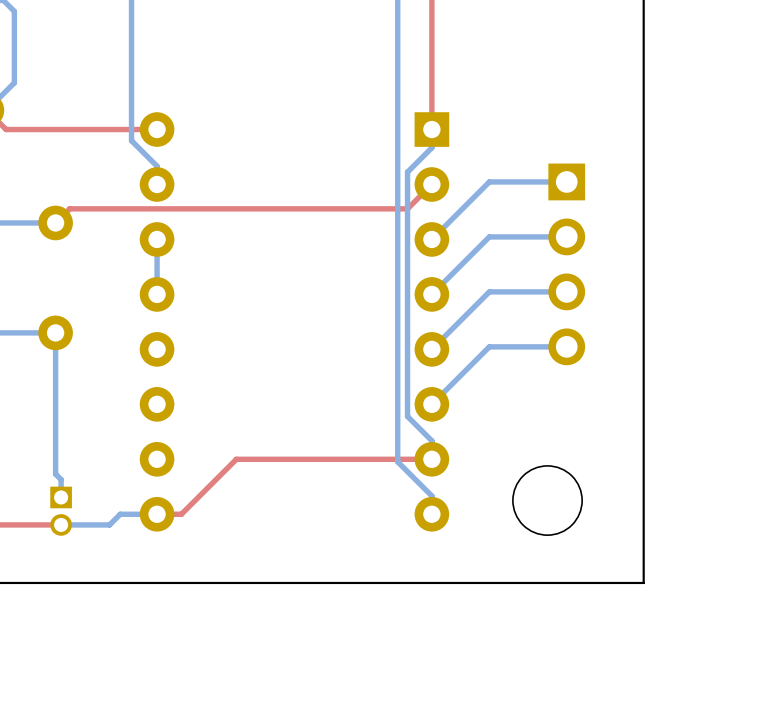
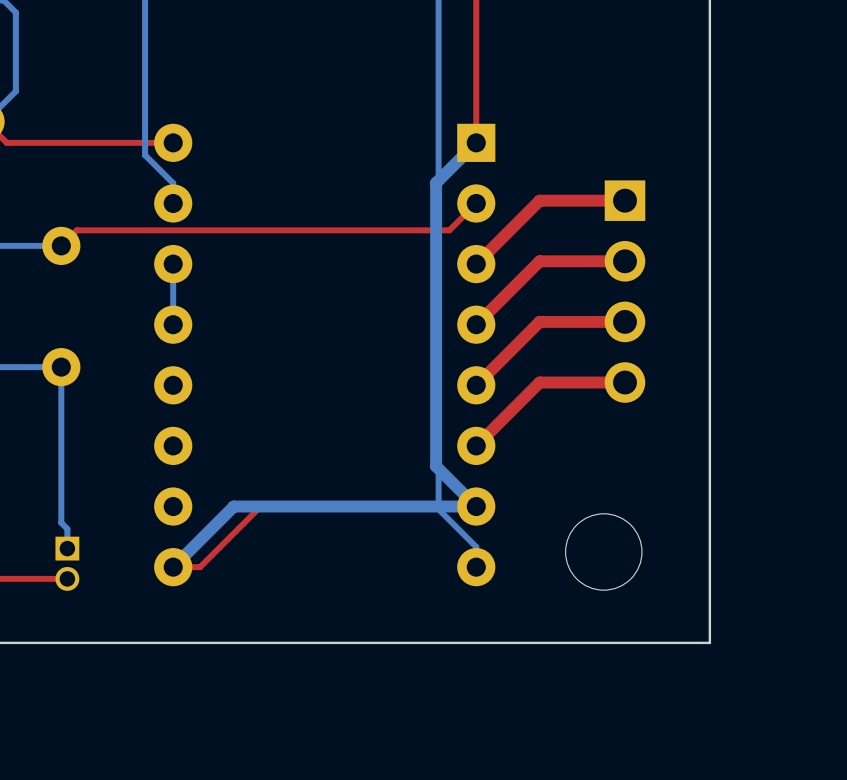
bottom track: (431, 129) (431, 147) (407, 172) (407, 416) (431, 440) (431, 459) -> (476, 142) (436, 182) (436, 466) (476, 506) (233, 506) (173, 567)
top track: none -> (625, 200) (539, 200) (476, 264)
bottom track: (574, 181) (489, 181) (431, 239) -> none
top track: none -> (625, 261) (539, 261) (476, 324)
bottom track: (574, 236) (489, 236) (431, 294) -> none
top track: none -> (625, 321) (539, 321) (476, 385)
bottom track: (574, 291) (489, 291) (431, 349) -> none
top track: none -> (625, 382) (539, 382) (476, 445)
bottom track: (574, 346) (489, 346) (431, 404) -> none
bottom track: (157, 514) (120, 514) (109, 524) (61, 524) -> none

